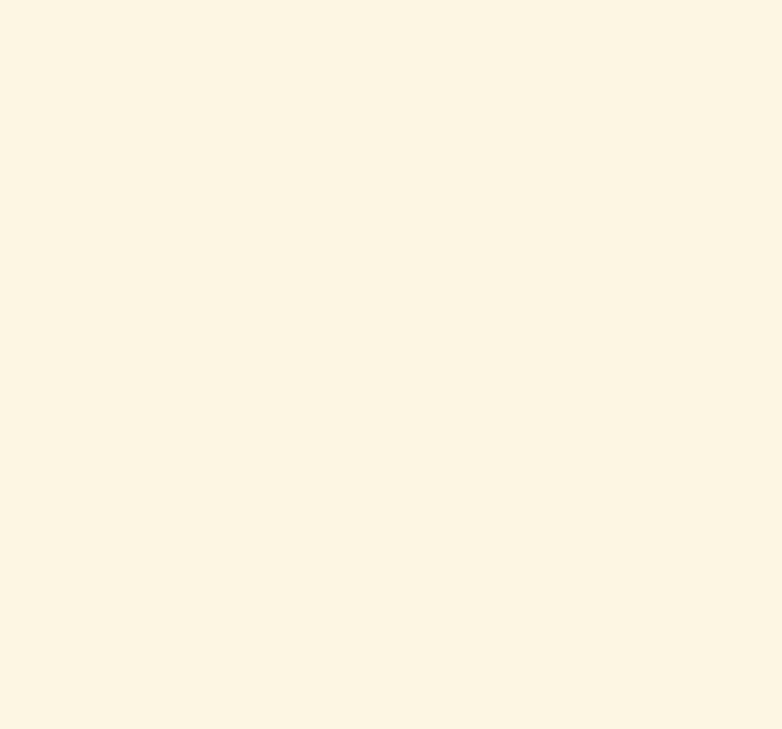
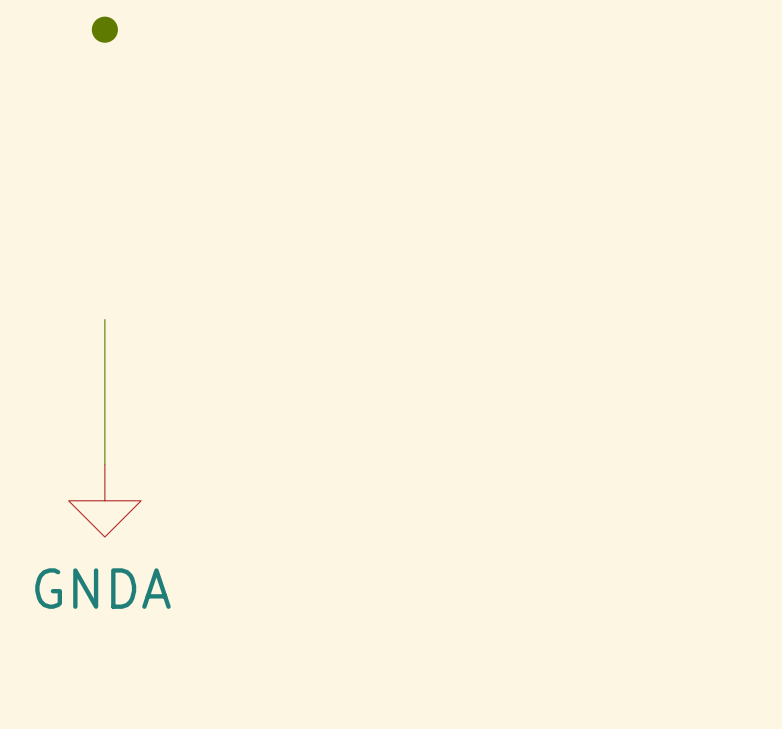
junction: none -> (104, 29)
wire: none -> (104, 319) (104, 464)
power symbol: none -> GNDA (104, 500)

